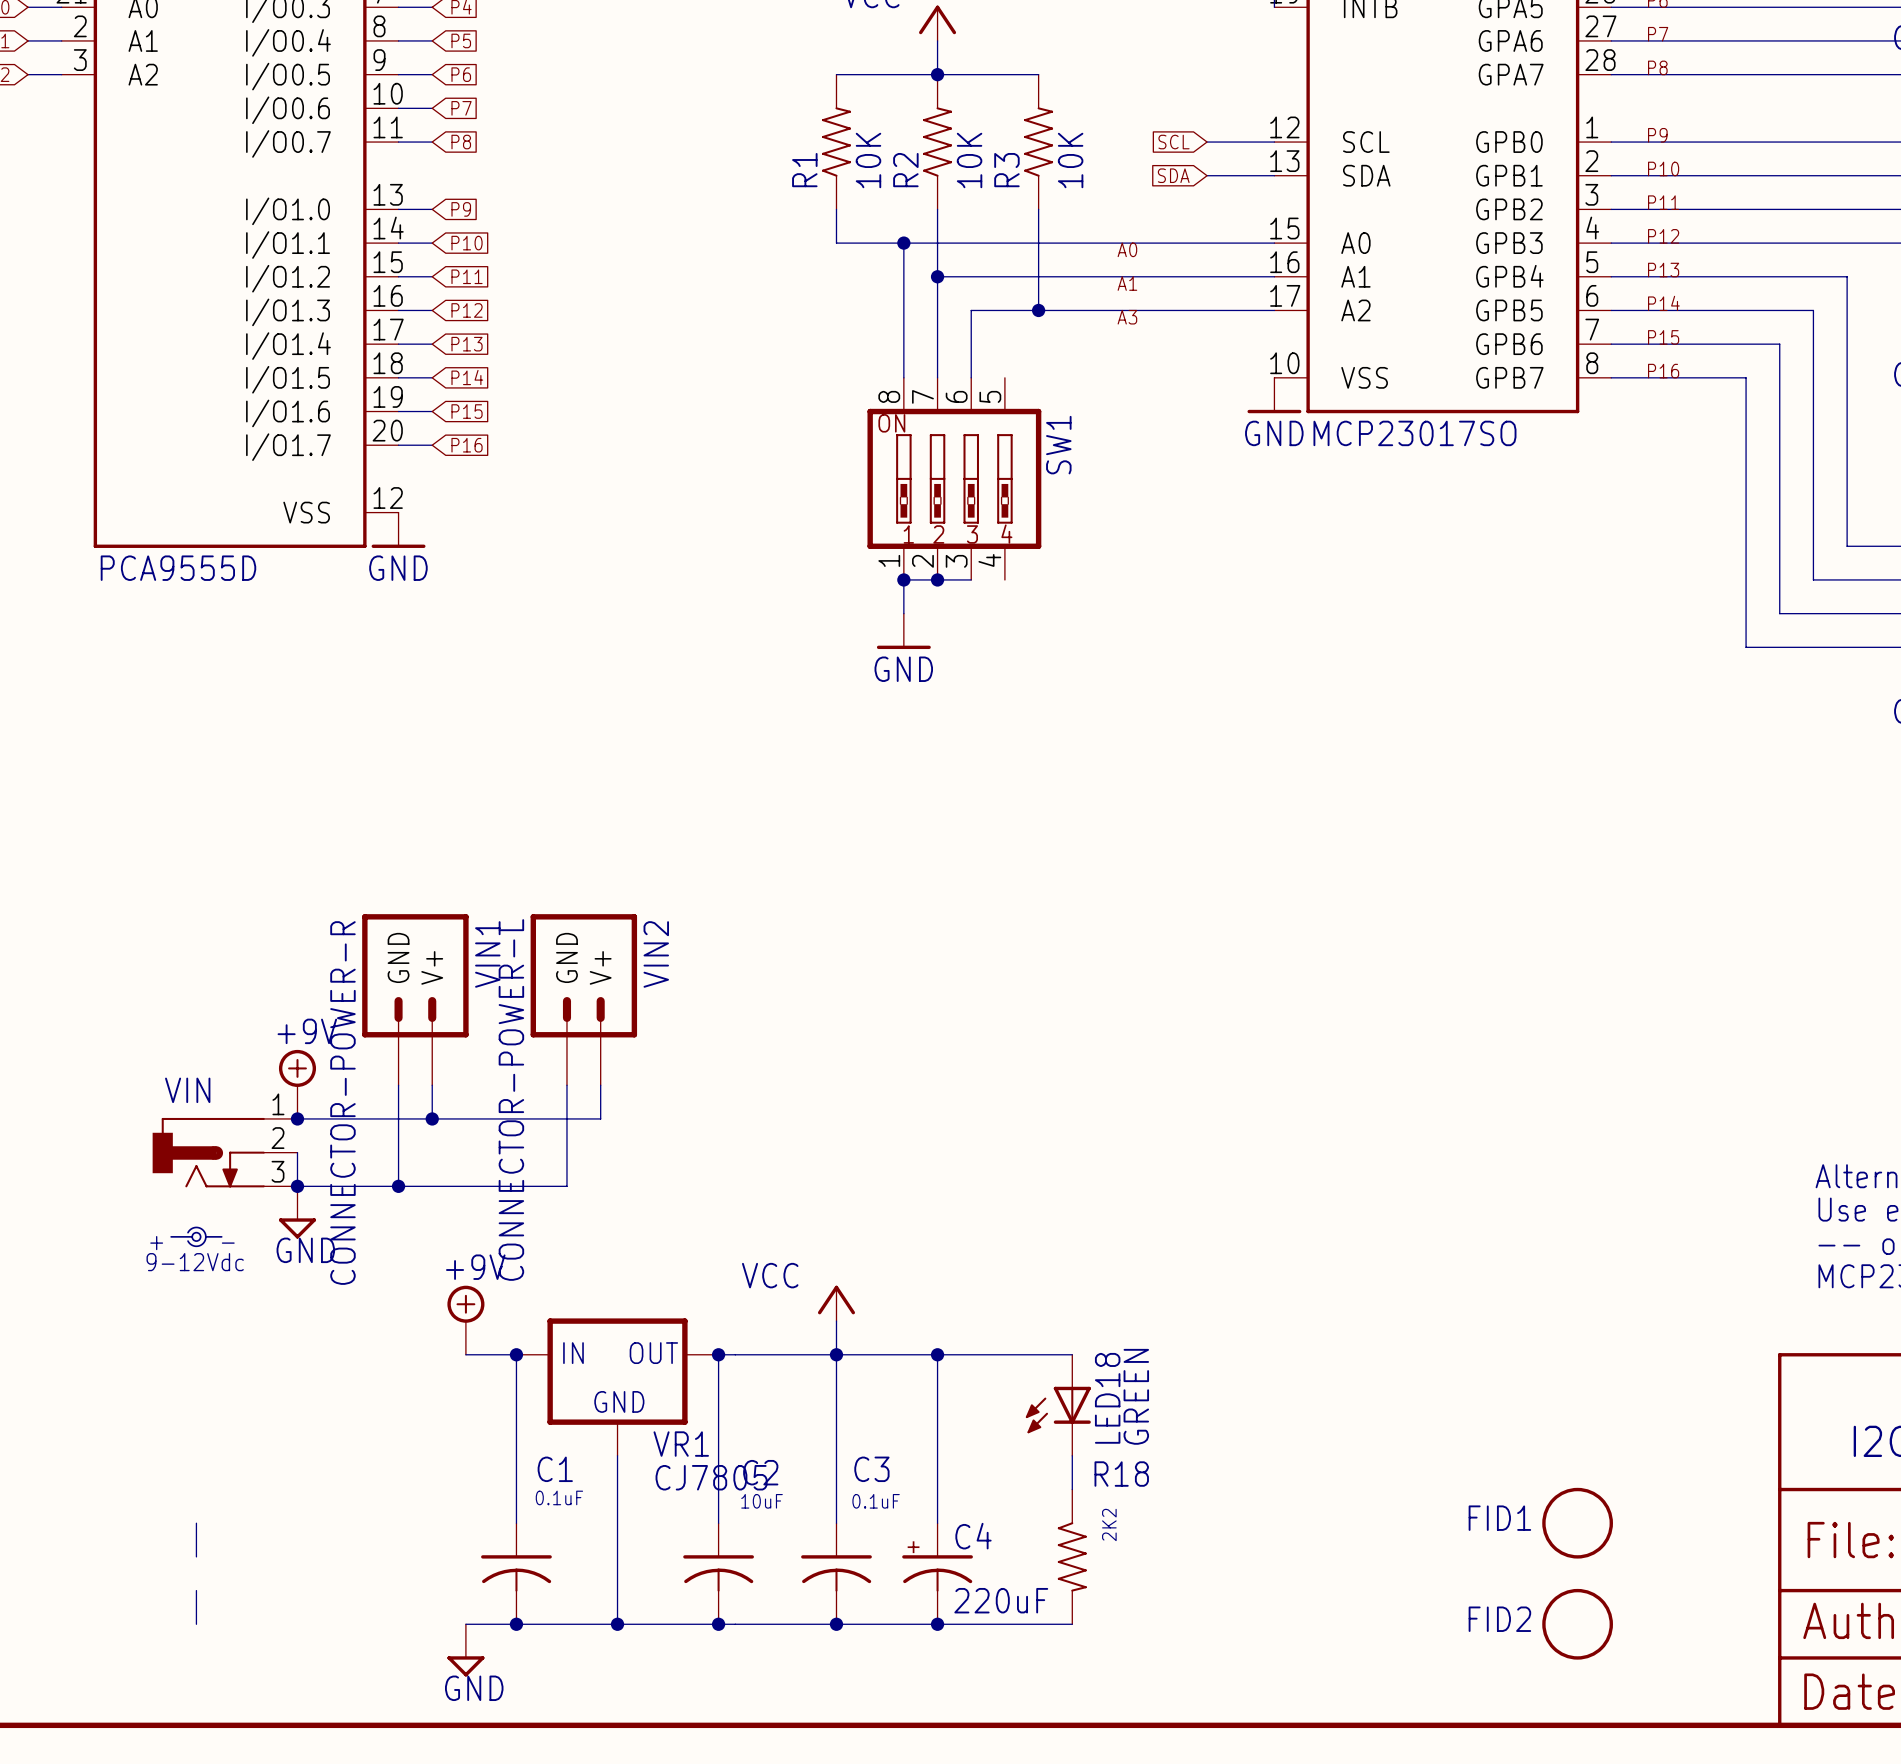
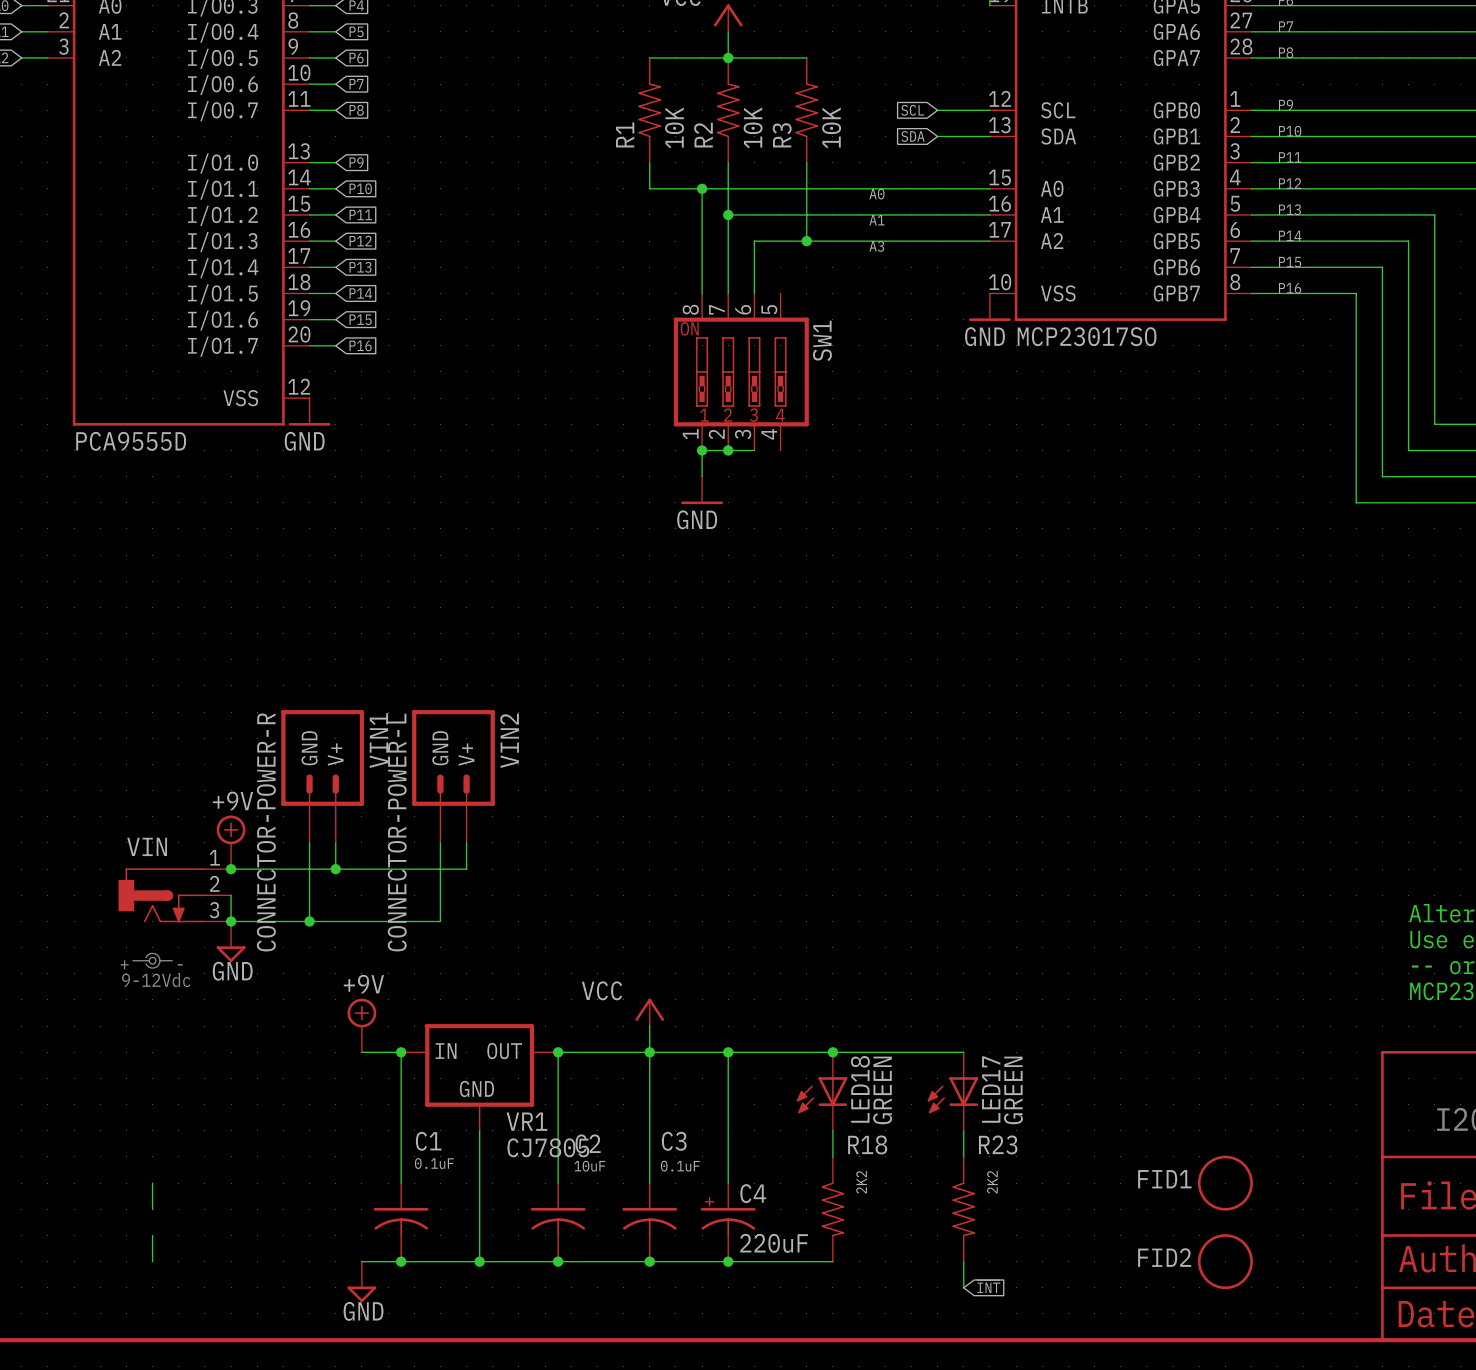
wire: none -> (832, 1052) (963, 1052)
junction: none -> (832, 1052)
LED17: none -> GREEN (952, 1091)
wire: none -> (963, 1130) (963, 1156)
R23: none -> 2K2 (963, 1209)
wire: none -> (963, 1261) (963, 1287)
global label: none -> ~{INT} (988, 1286)

